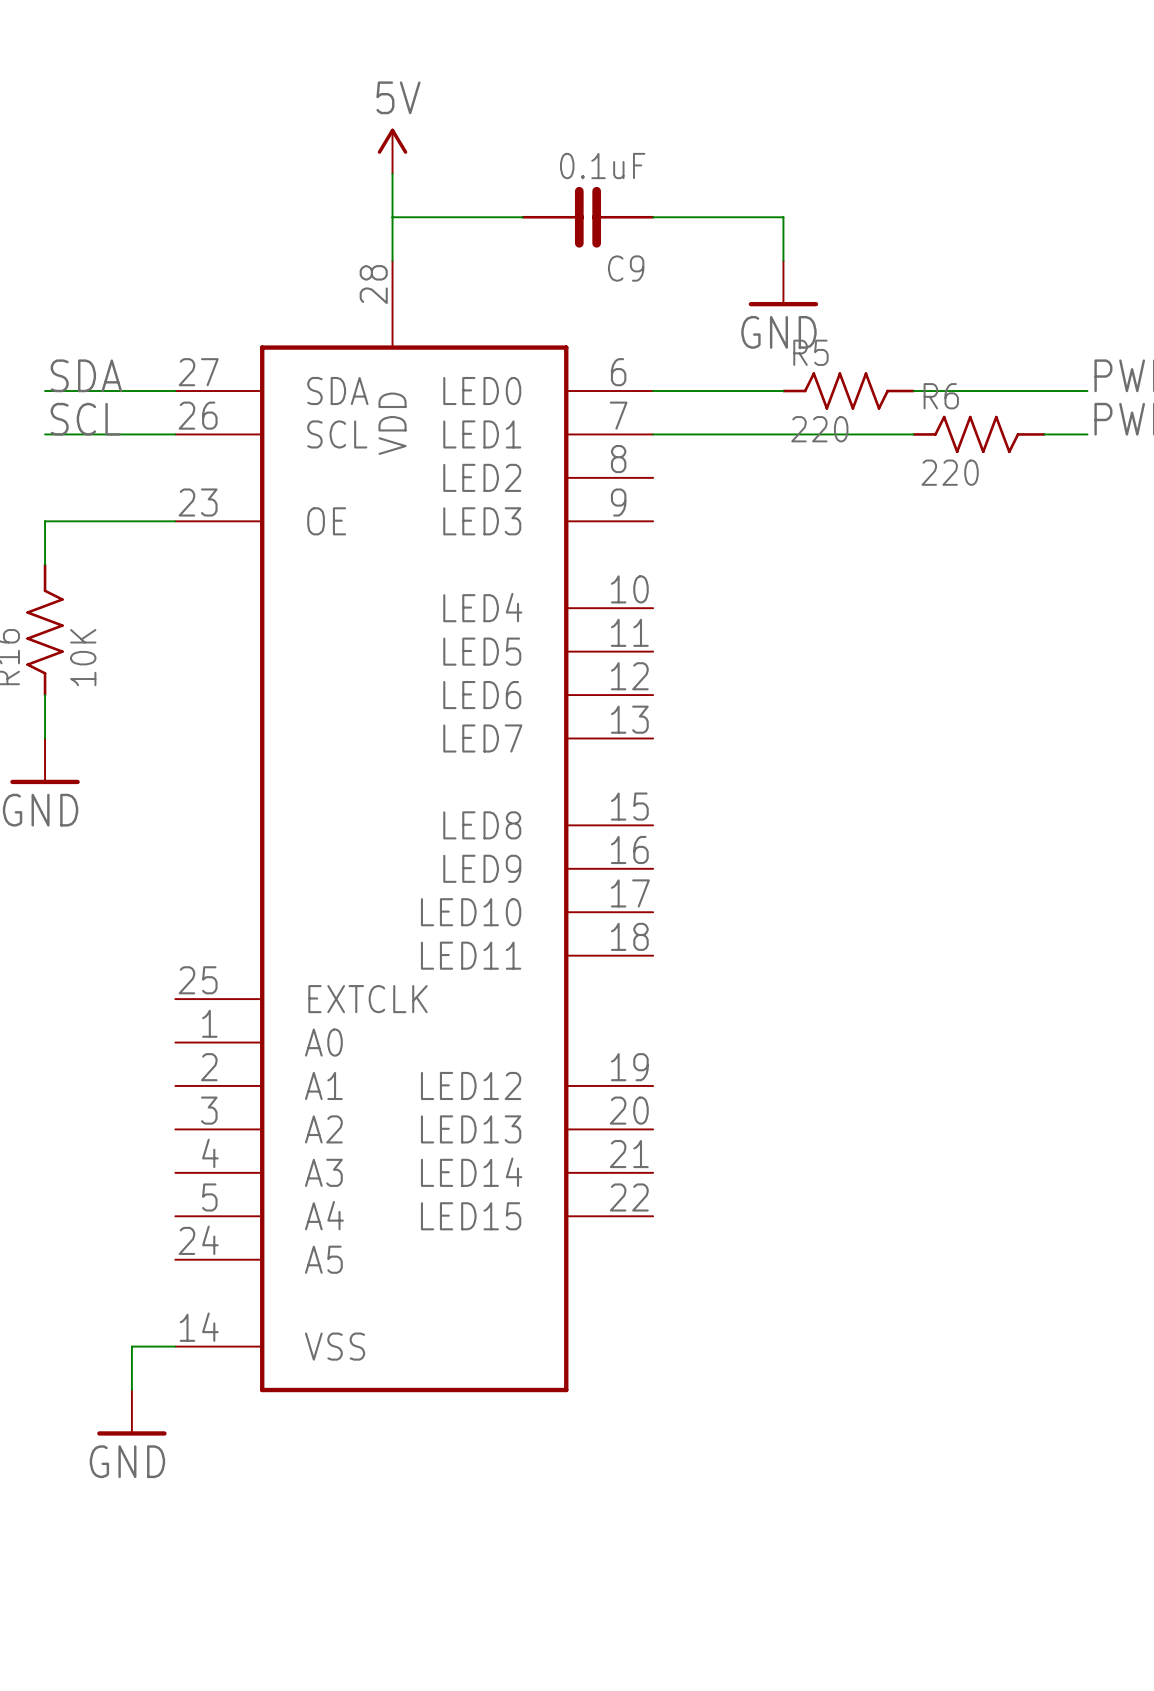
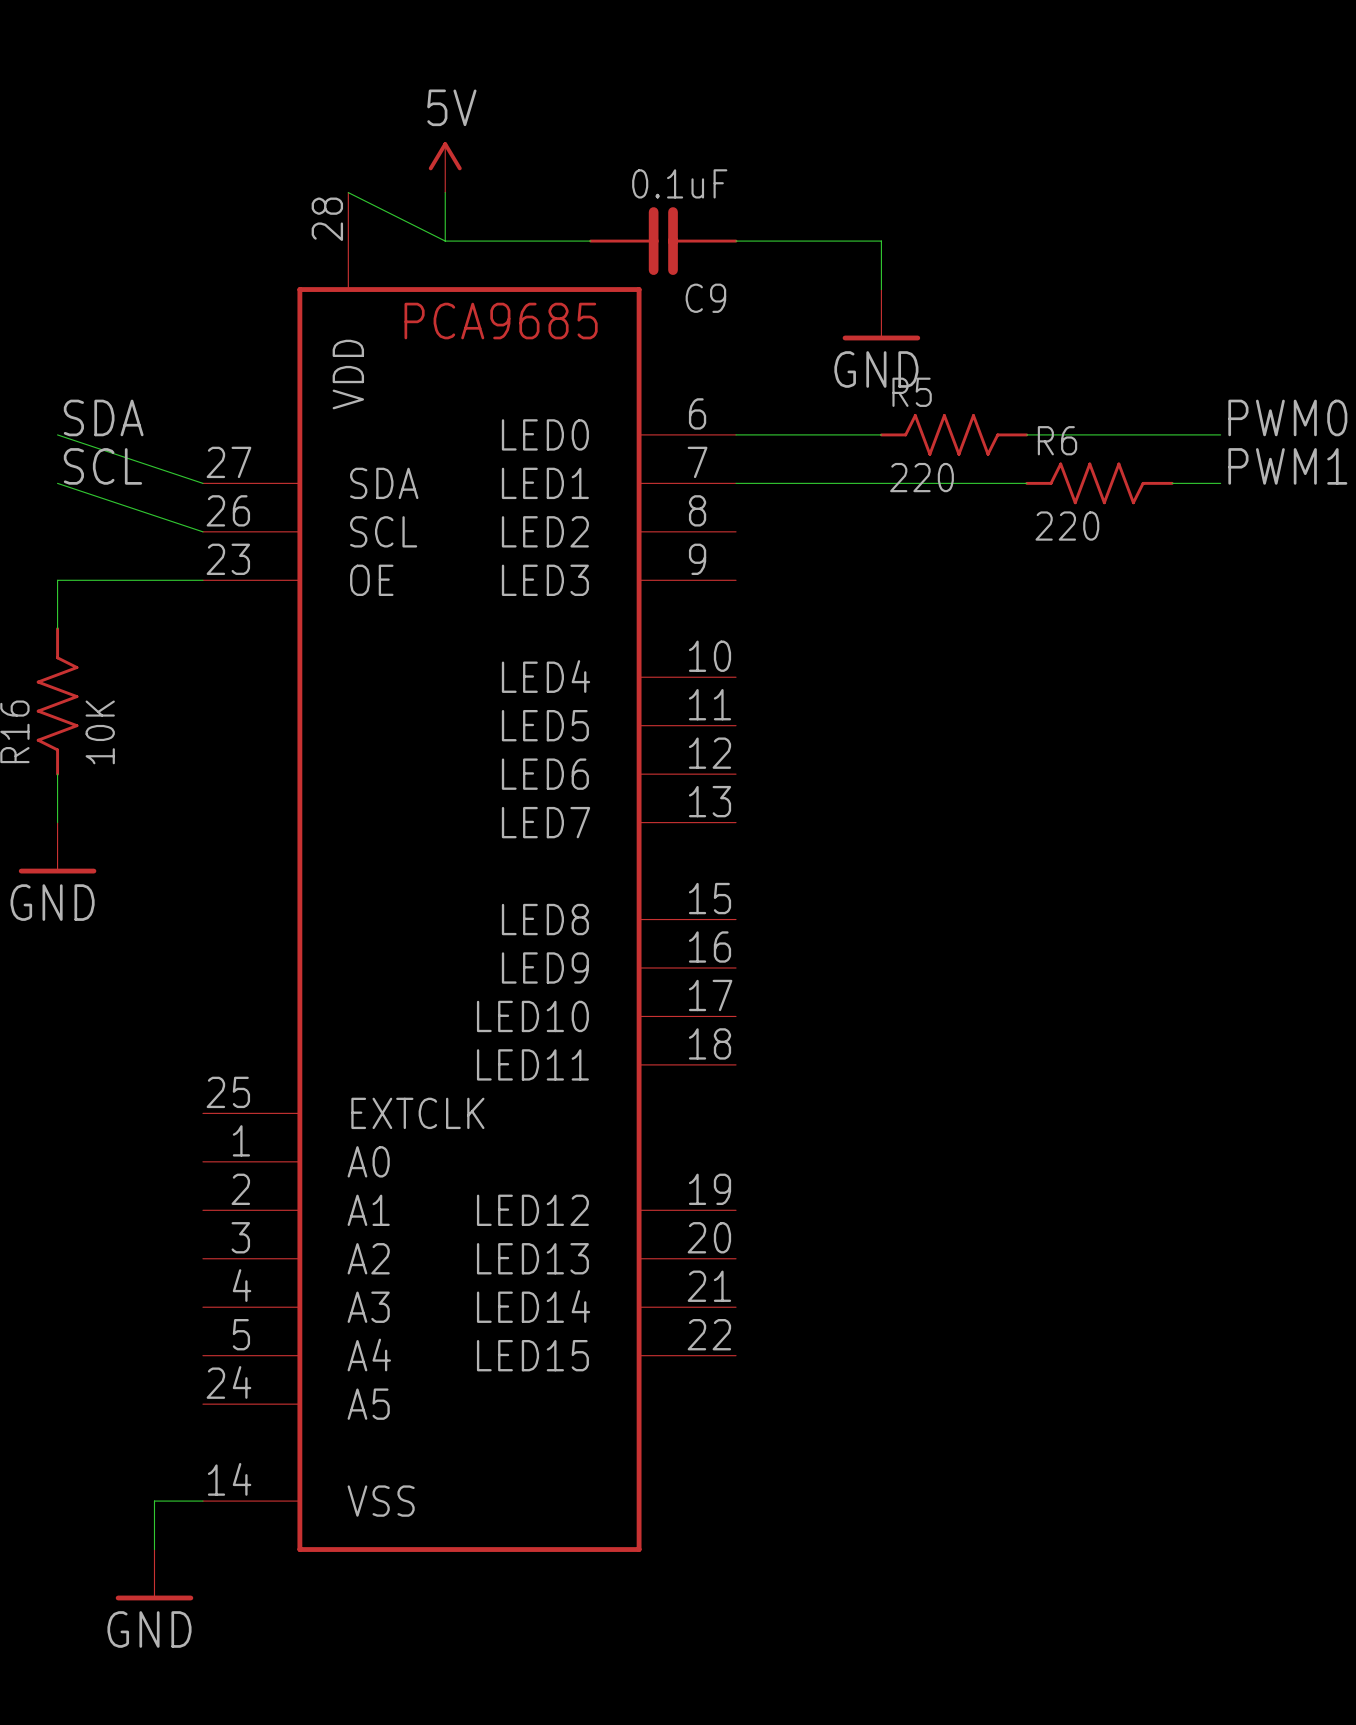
wire: (392, 217) (392, 260) -> (445, 241) (348, 192)
wire: (45, 391) (175, 391) -> (57, 434) (202, 483)
wire: (45, 434) (175, 434) -> (57, 483) (202, 531)
part: none -> (469, 872)
part: (414, 826) -> none

